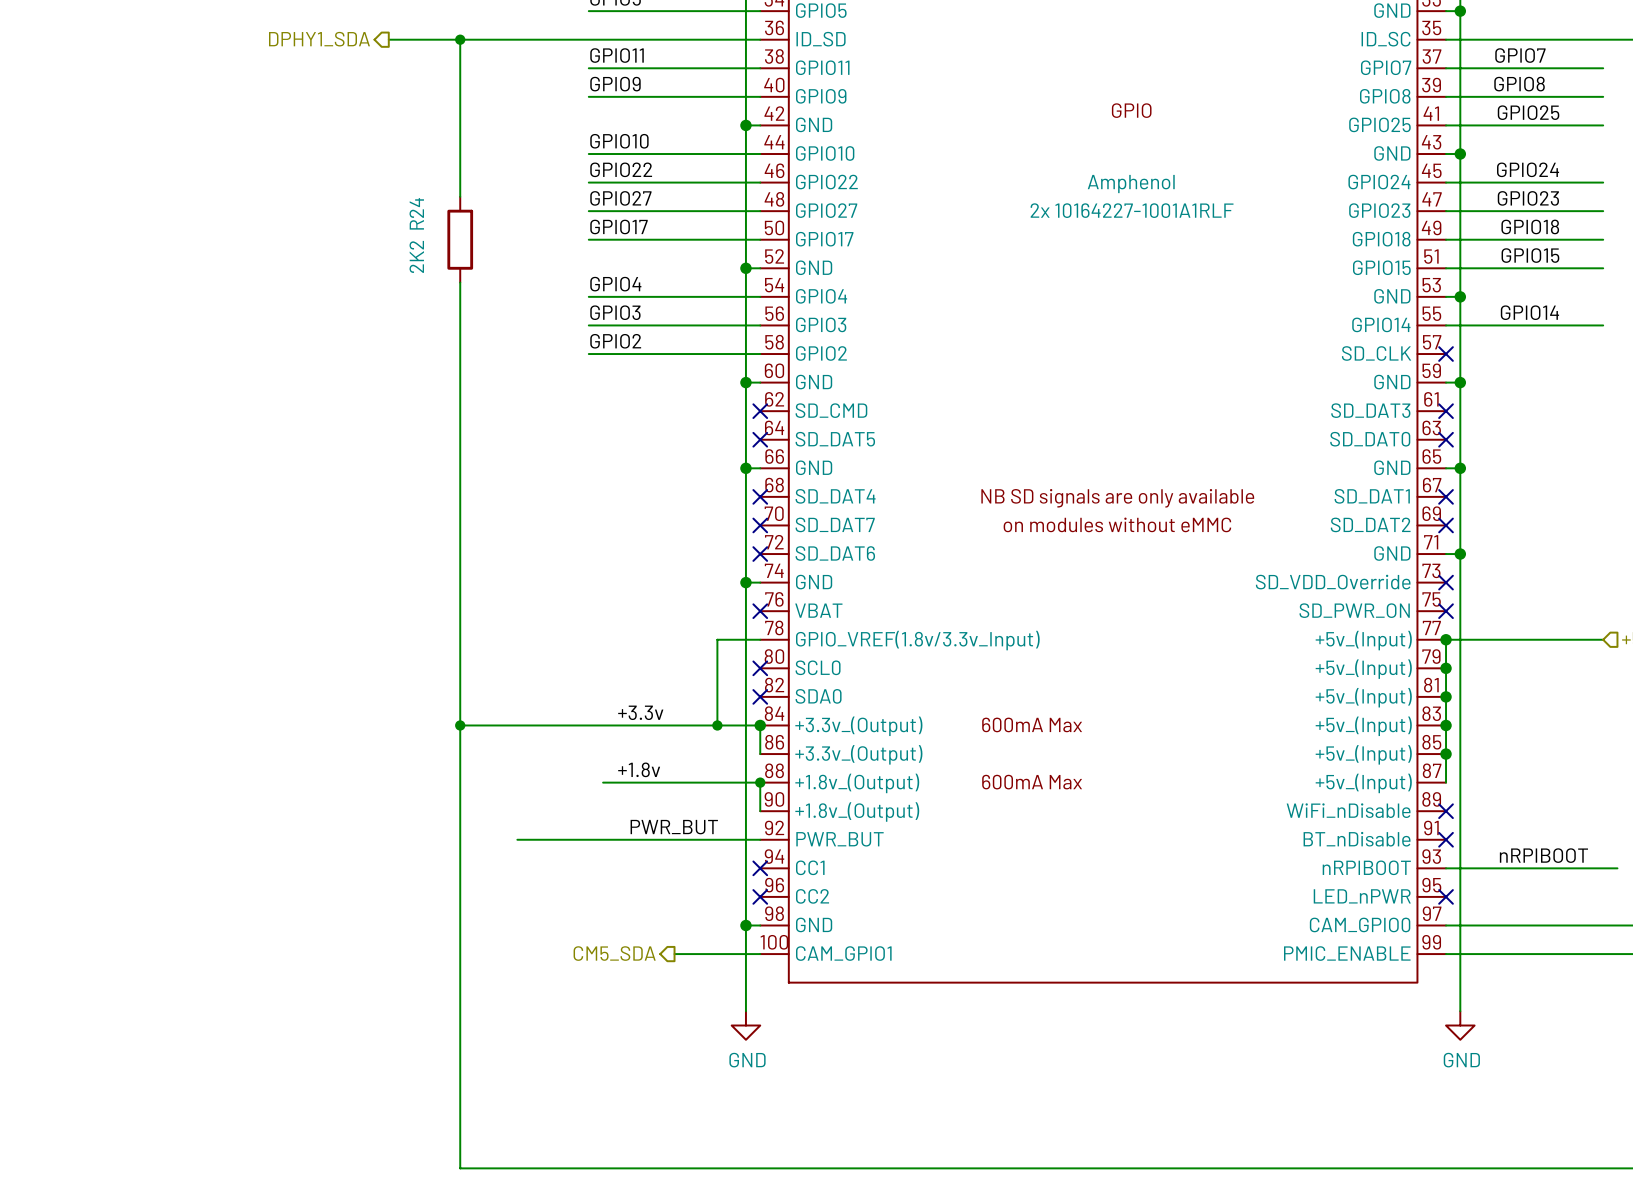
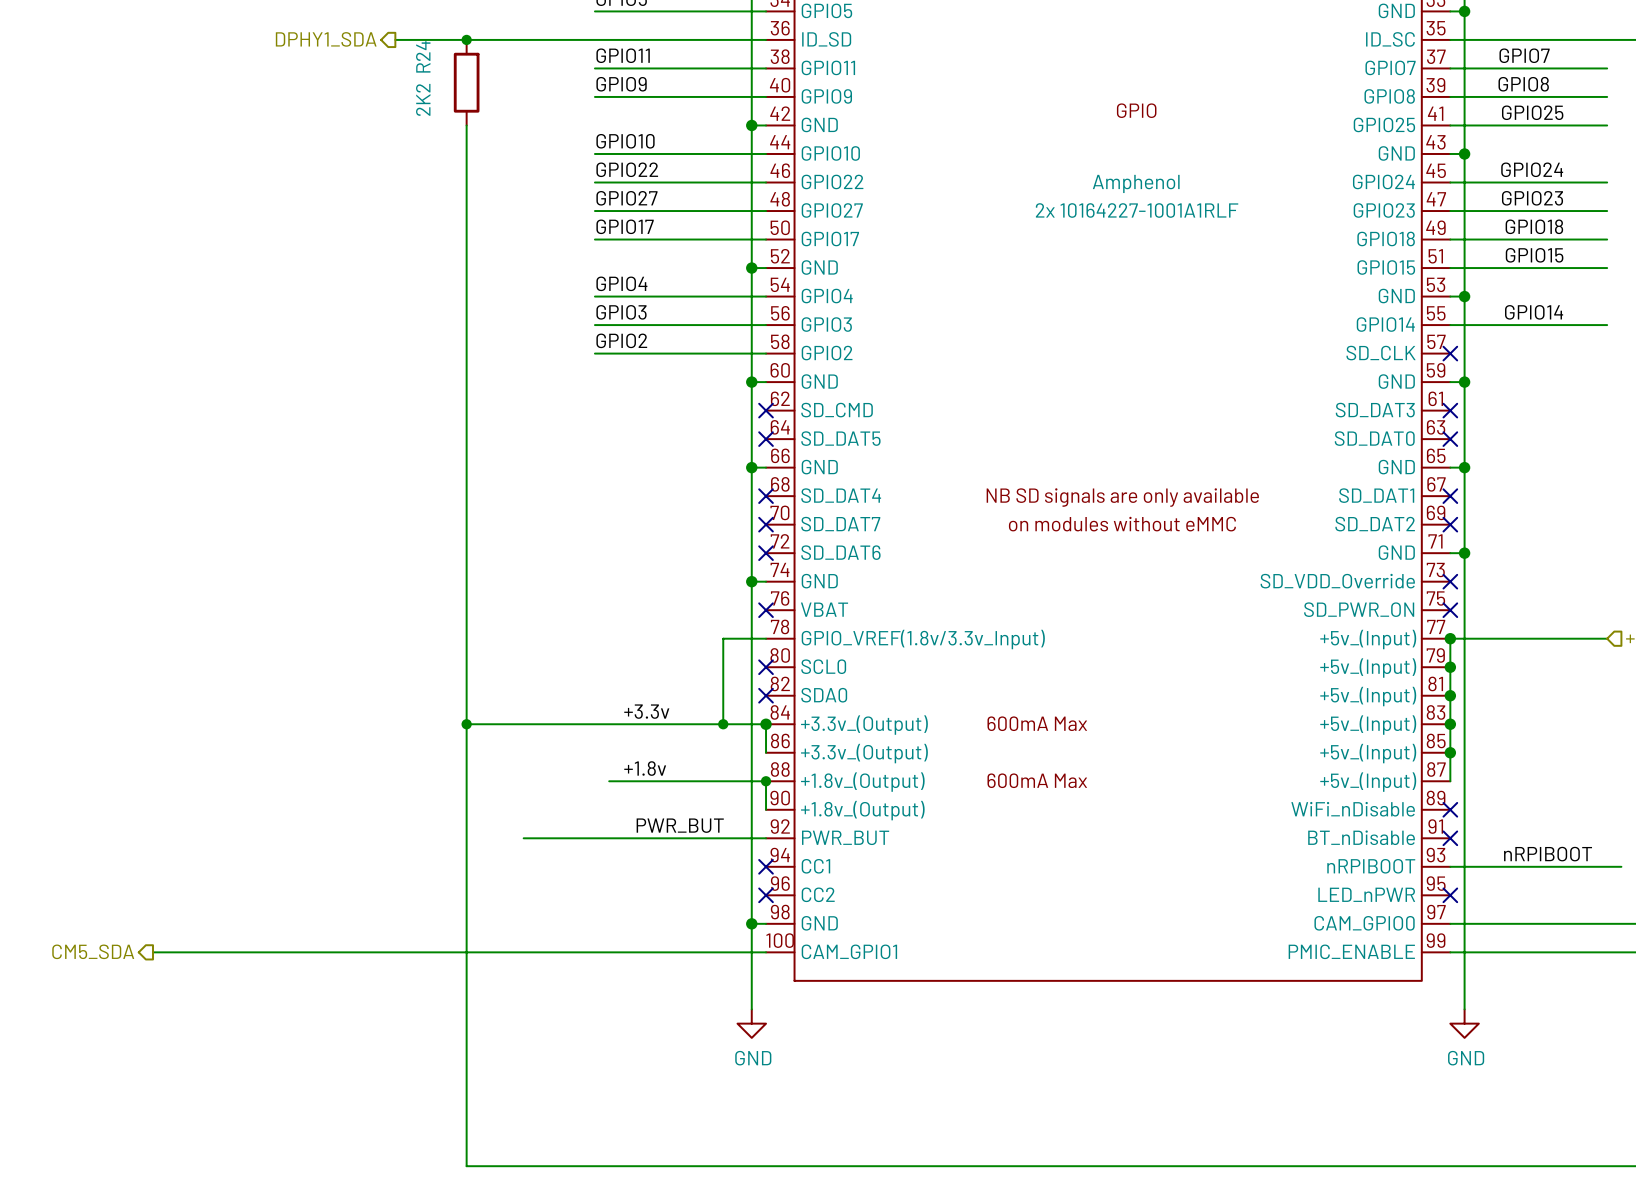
wire: (460, 39) (460, 125) -> (466, 196) (466, 282)
R24 position: (460, 239) -> (466, 82)
hierarchical label: none -> CM5_SDA (93, 951)
hierarchical label: CM5_SDA (614, 953) -> none
wire: none -> (153, 952) (680, 952)

